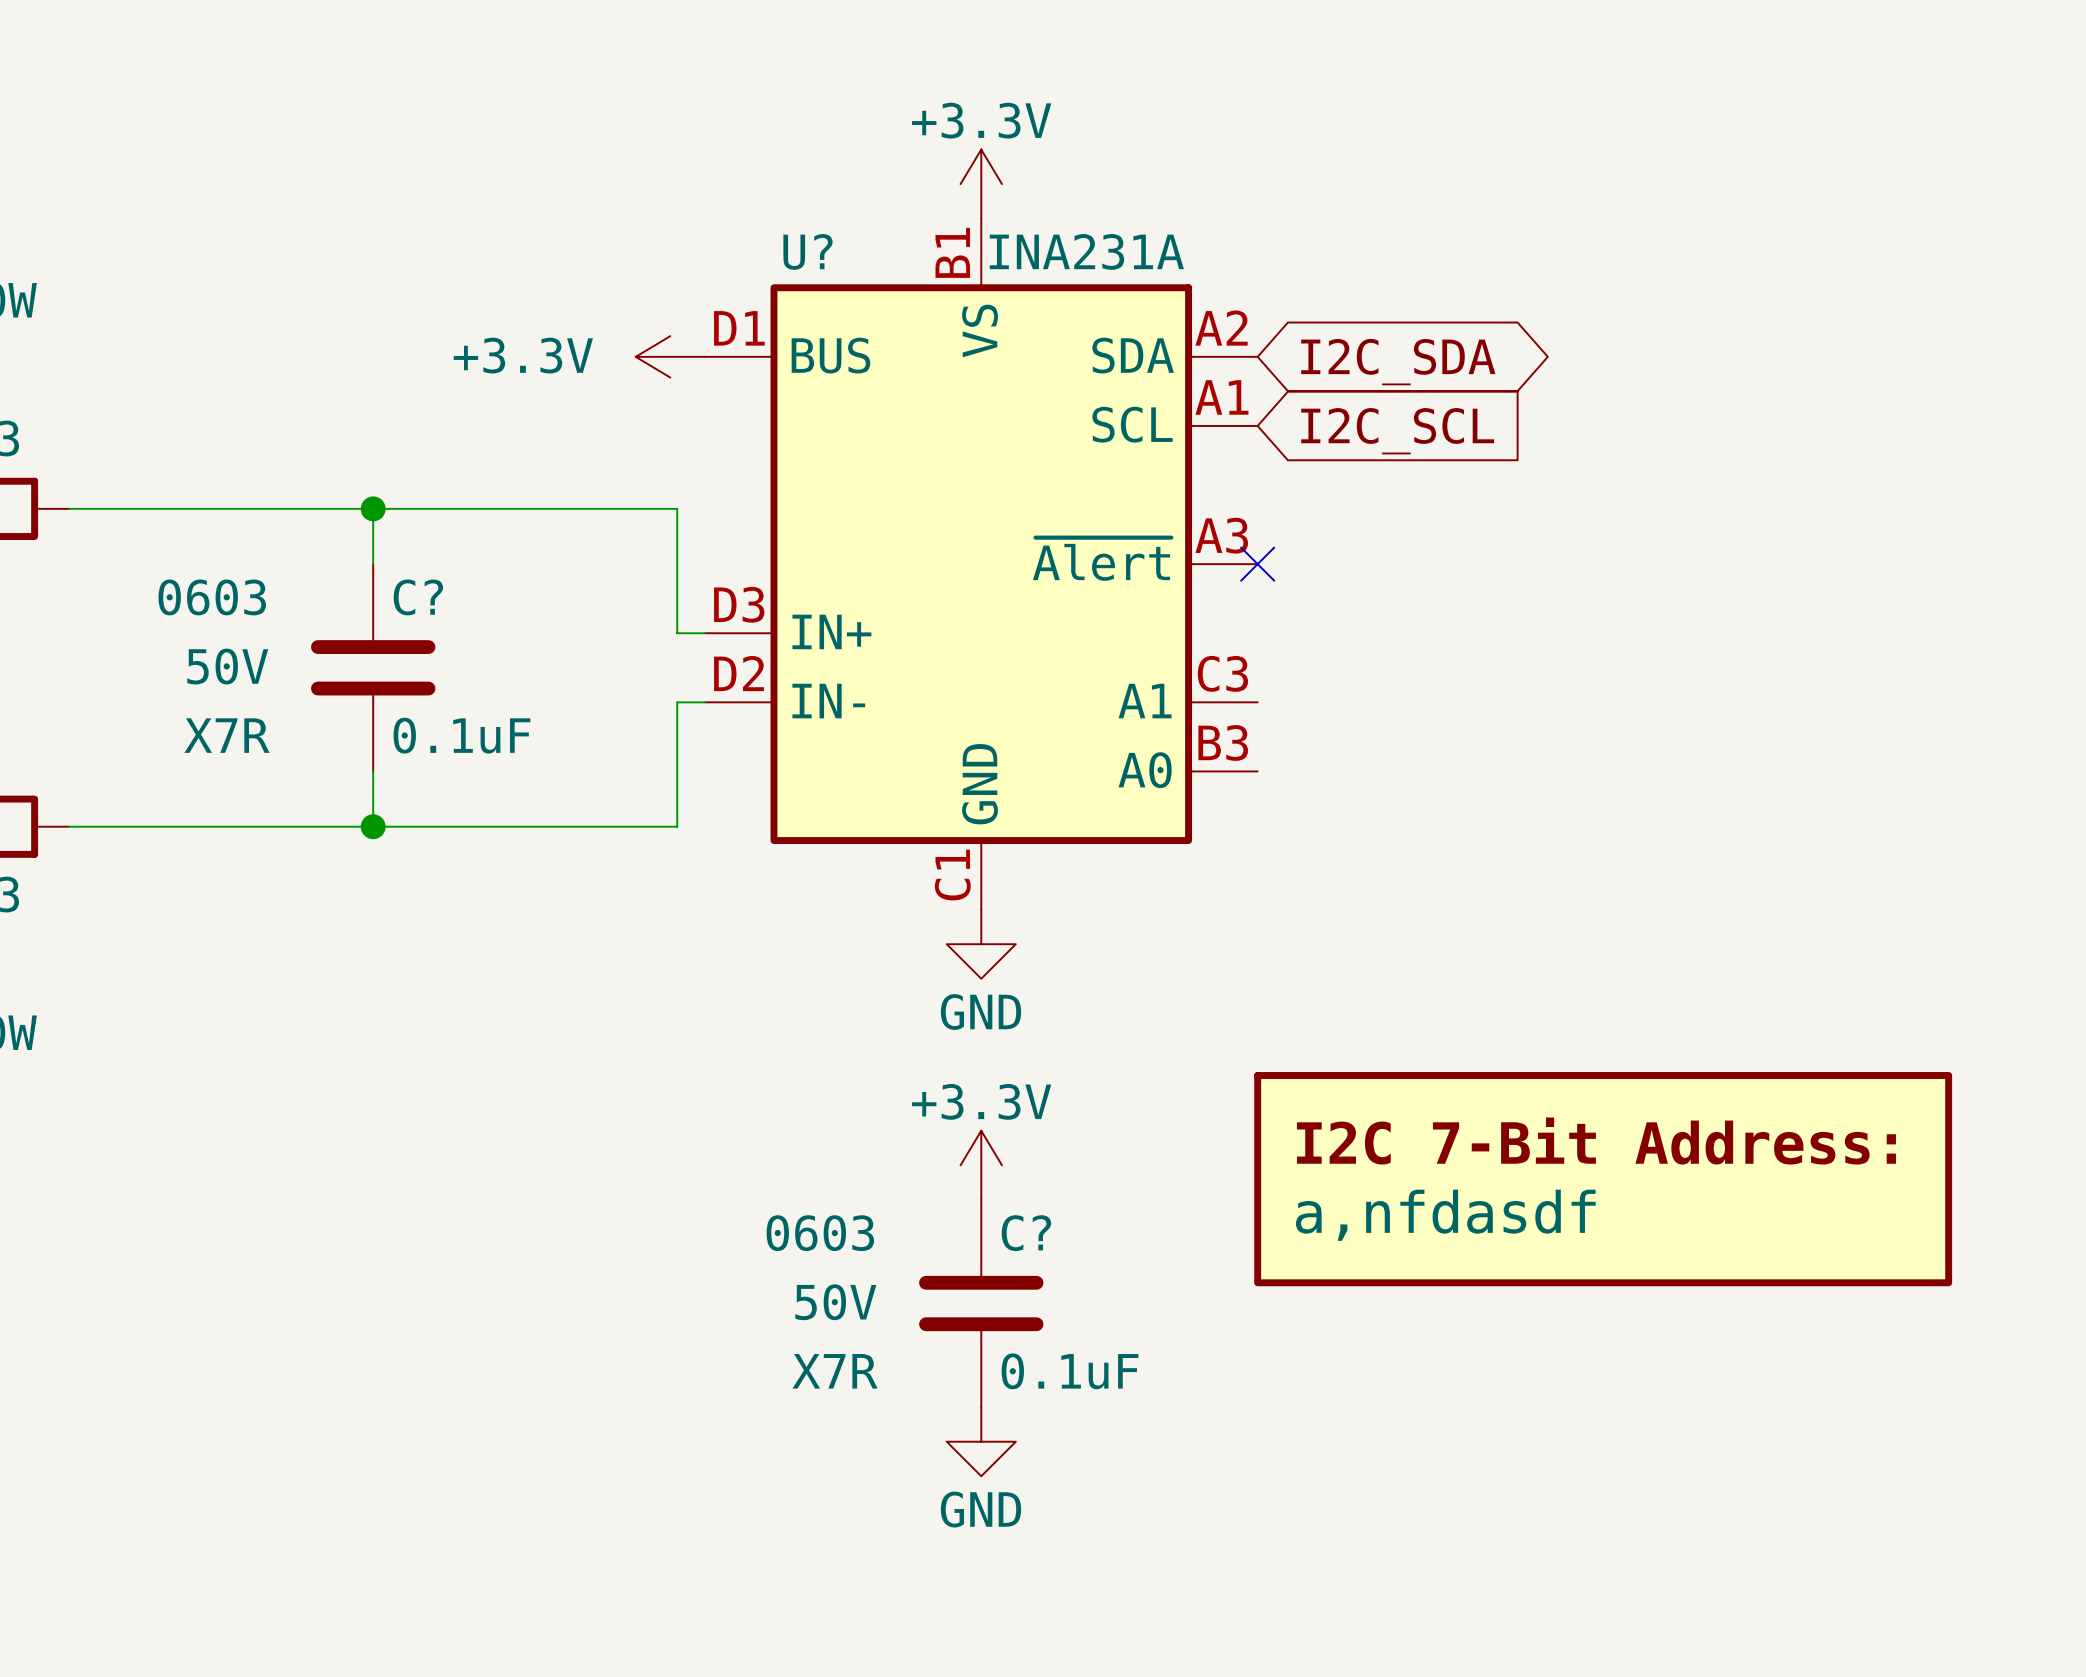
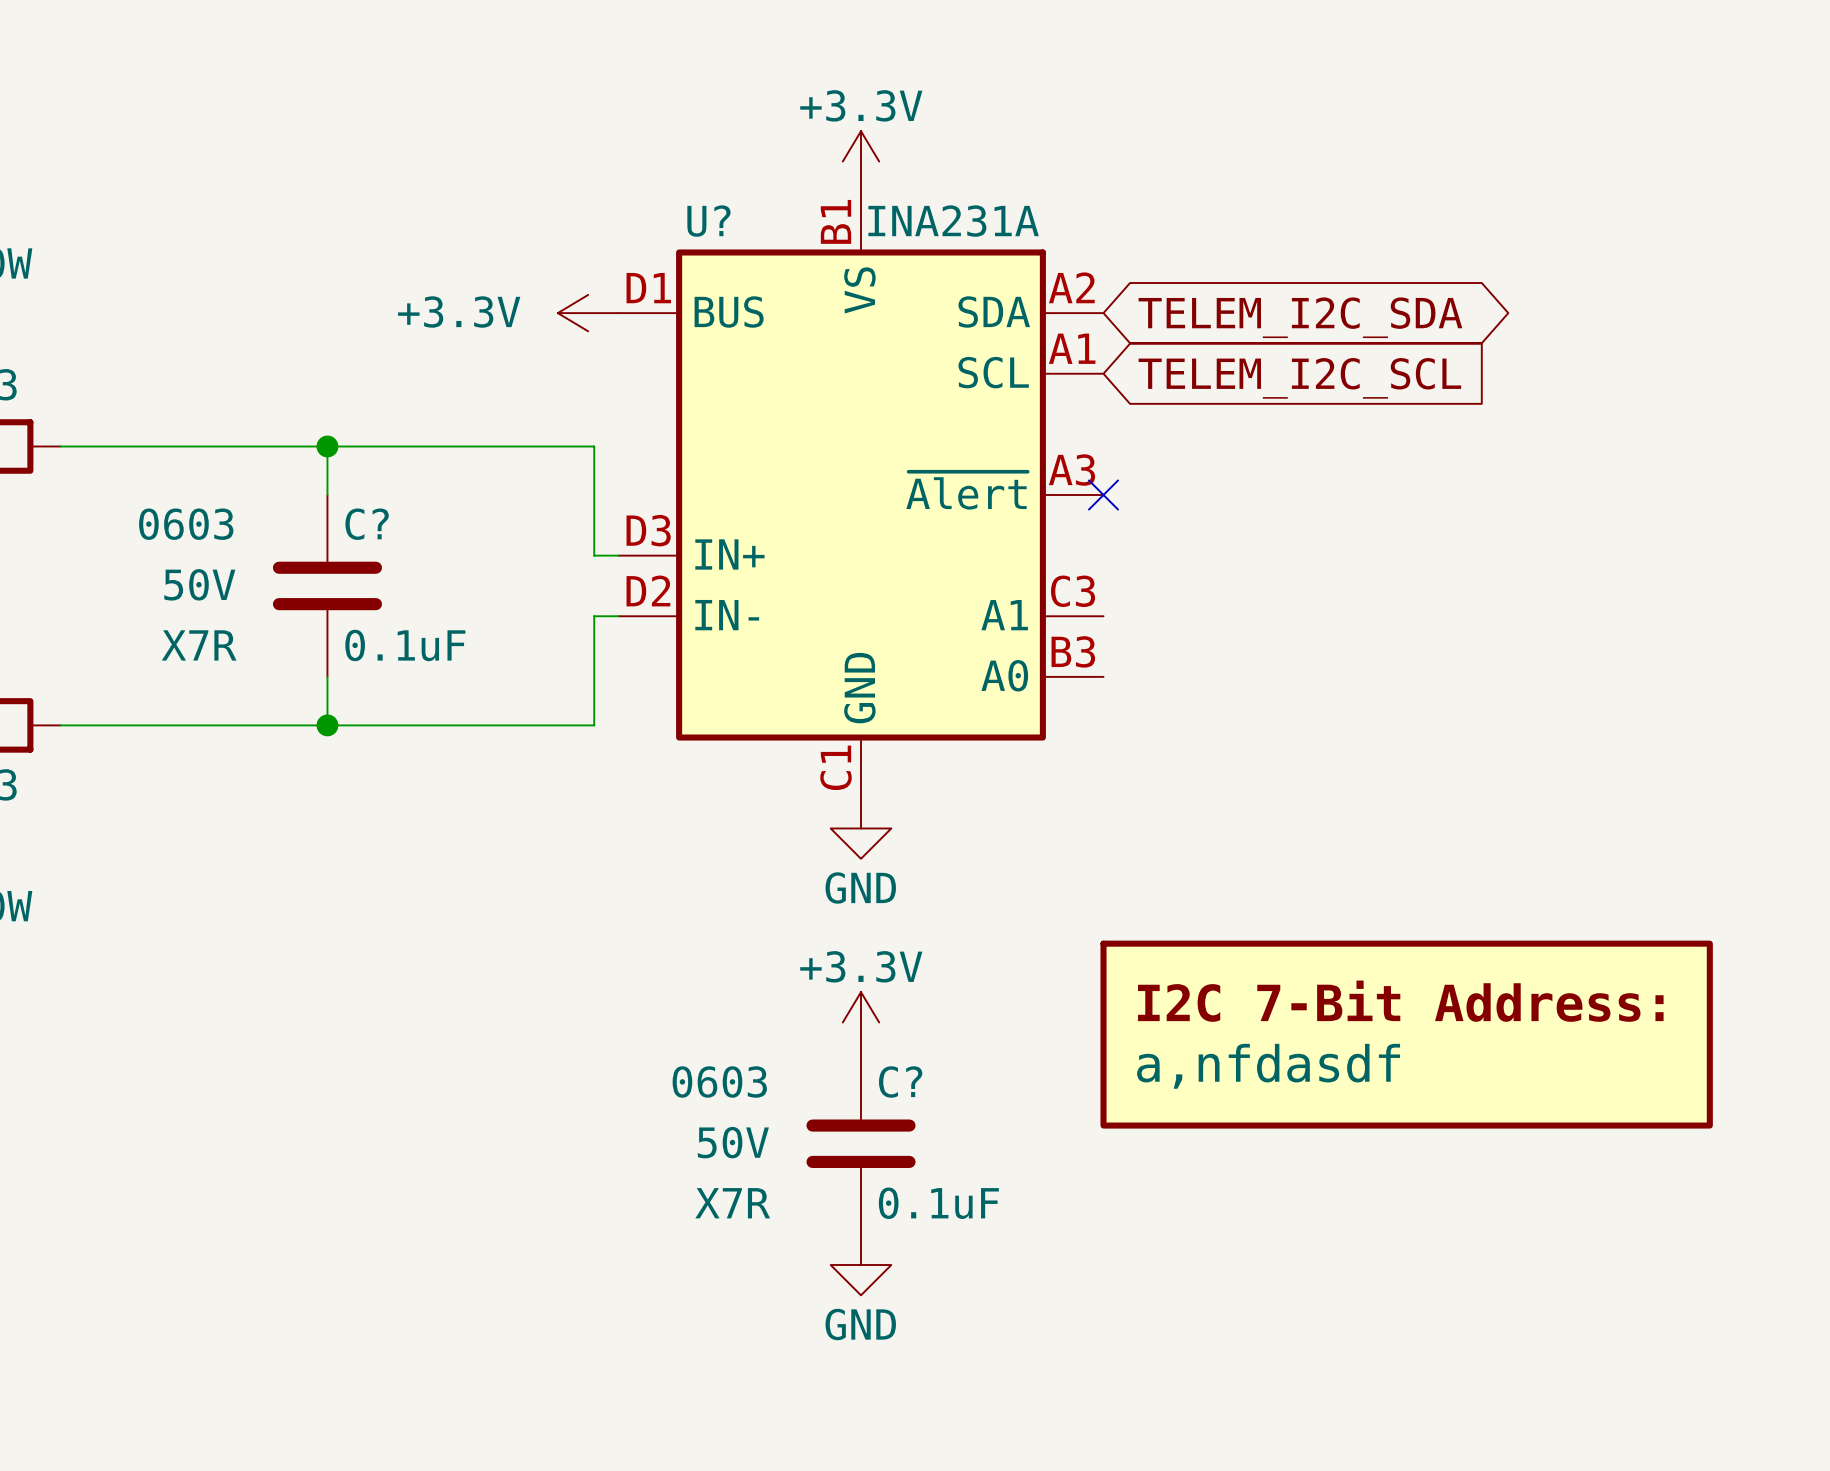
global label: I2C_SDA (1398, 362) -> TELEM_I2C_SDA (1300, 317)
global label: I2C_SCL (1397, 431) -> TELEM_I2C_SCL (1299, 378)

